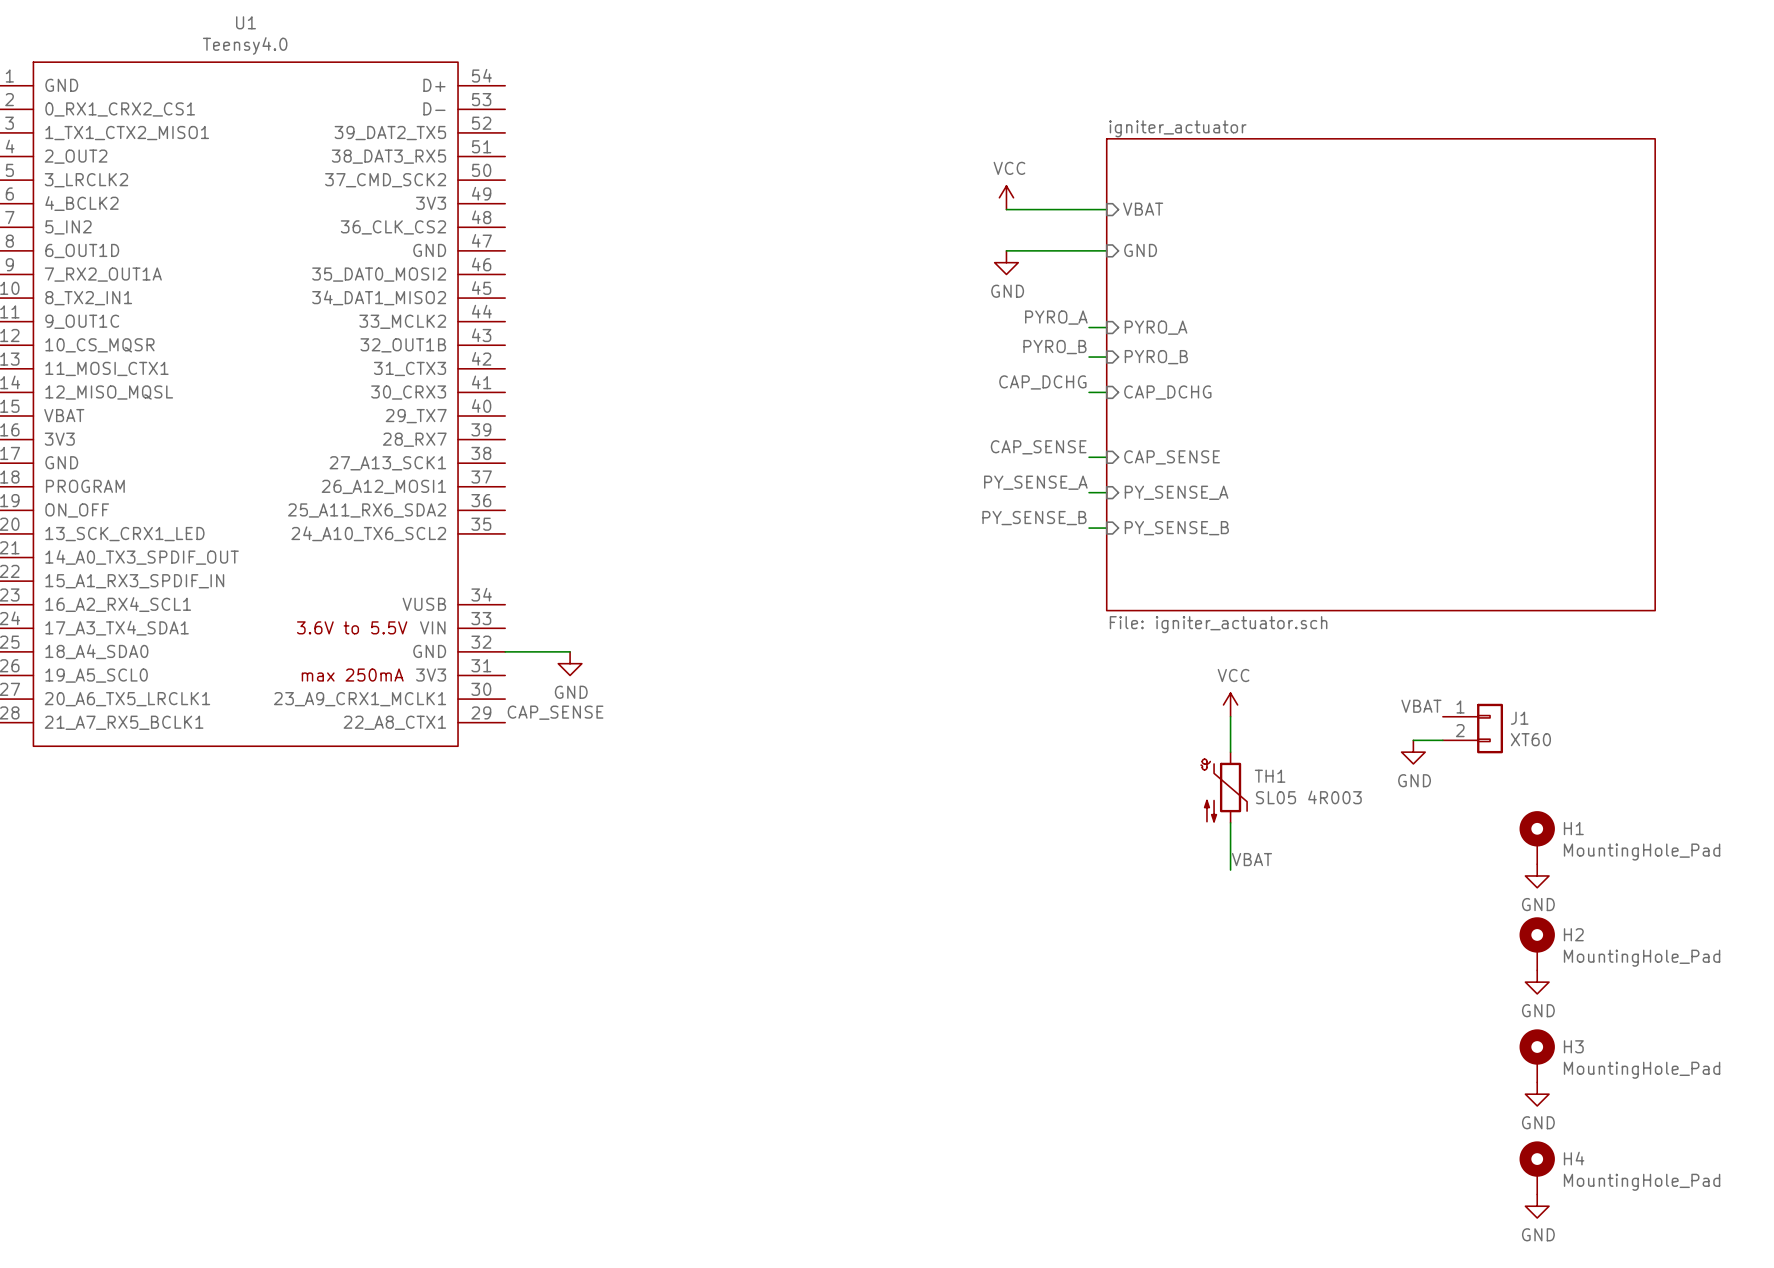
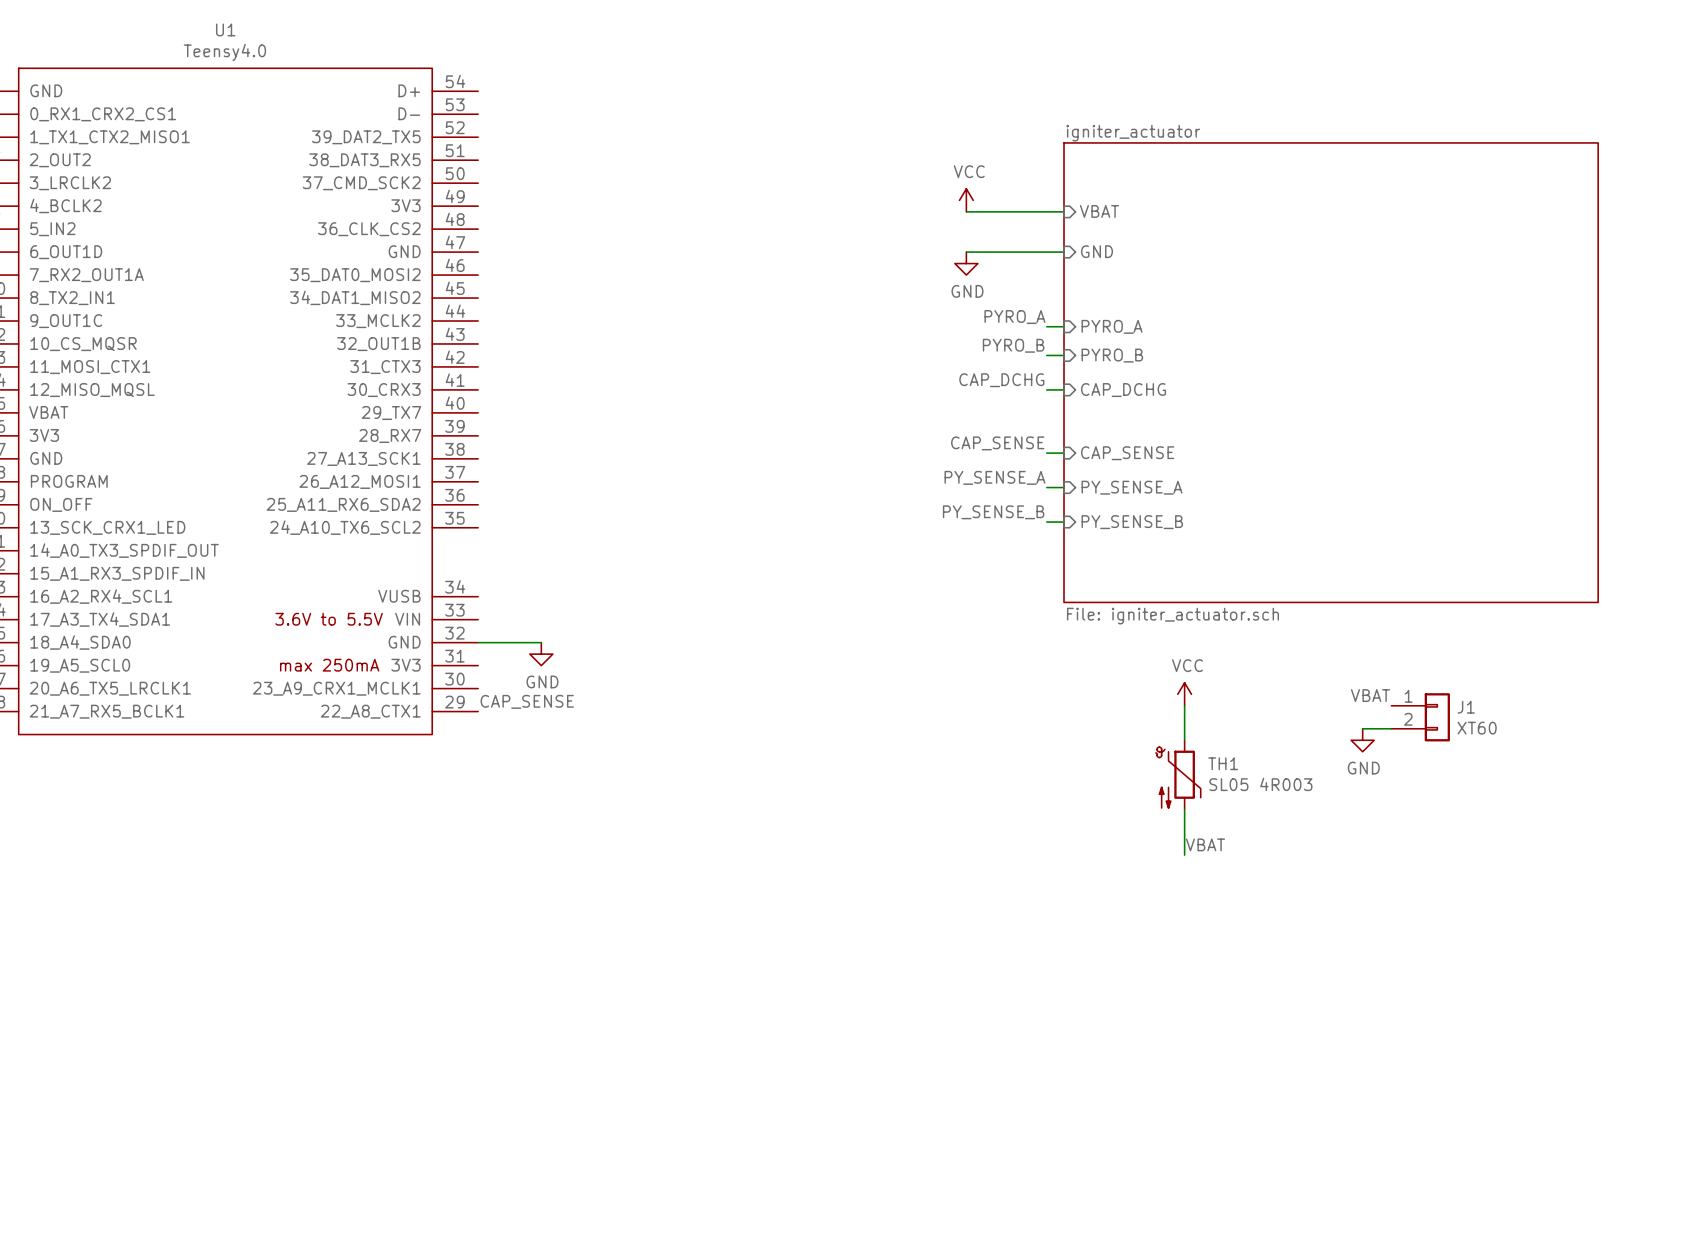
H1: MountingHole_Pad (1537, 837) -> none
power symbol: GND (1537, 875) -> none
H2: MountingHole_Pad (1537, 943) -> none
power symbol: GND (1537, 982) -> none
H3: MountingHole_Pad (1537, 1055) -> none
power symbol: GND (1537, 1094) -> none
H4: MountingHole_Pad (1537, 1167) -> none
power symbol: GND (1537, 1206) -> none

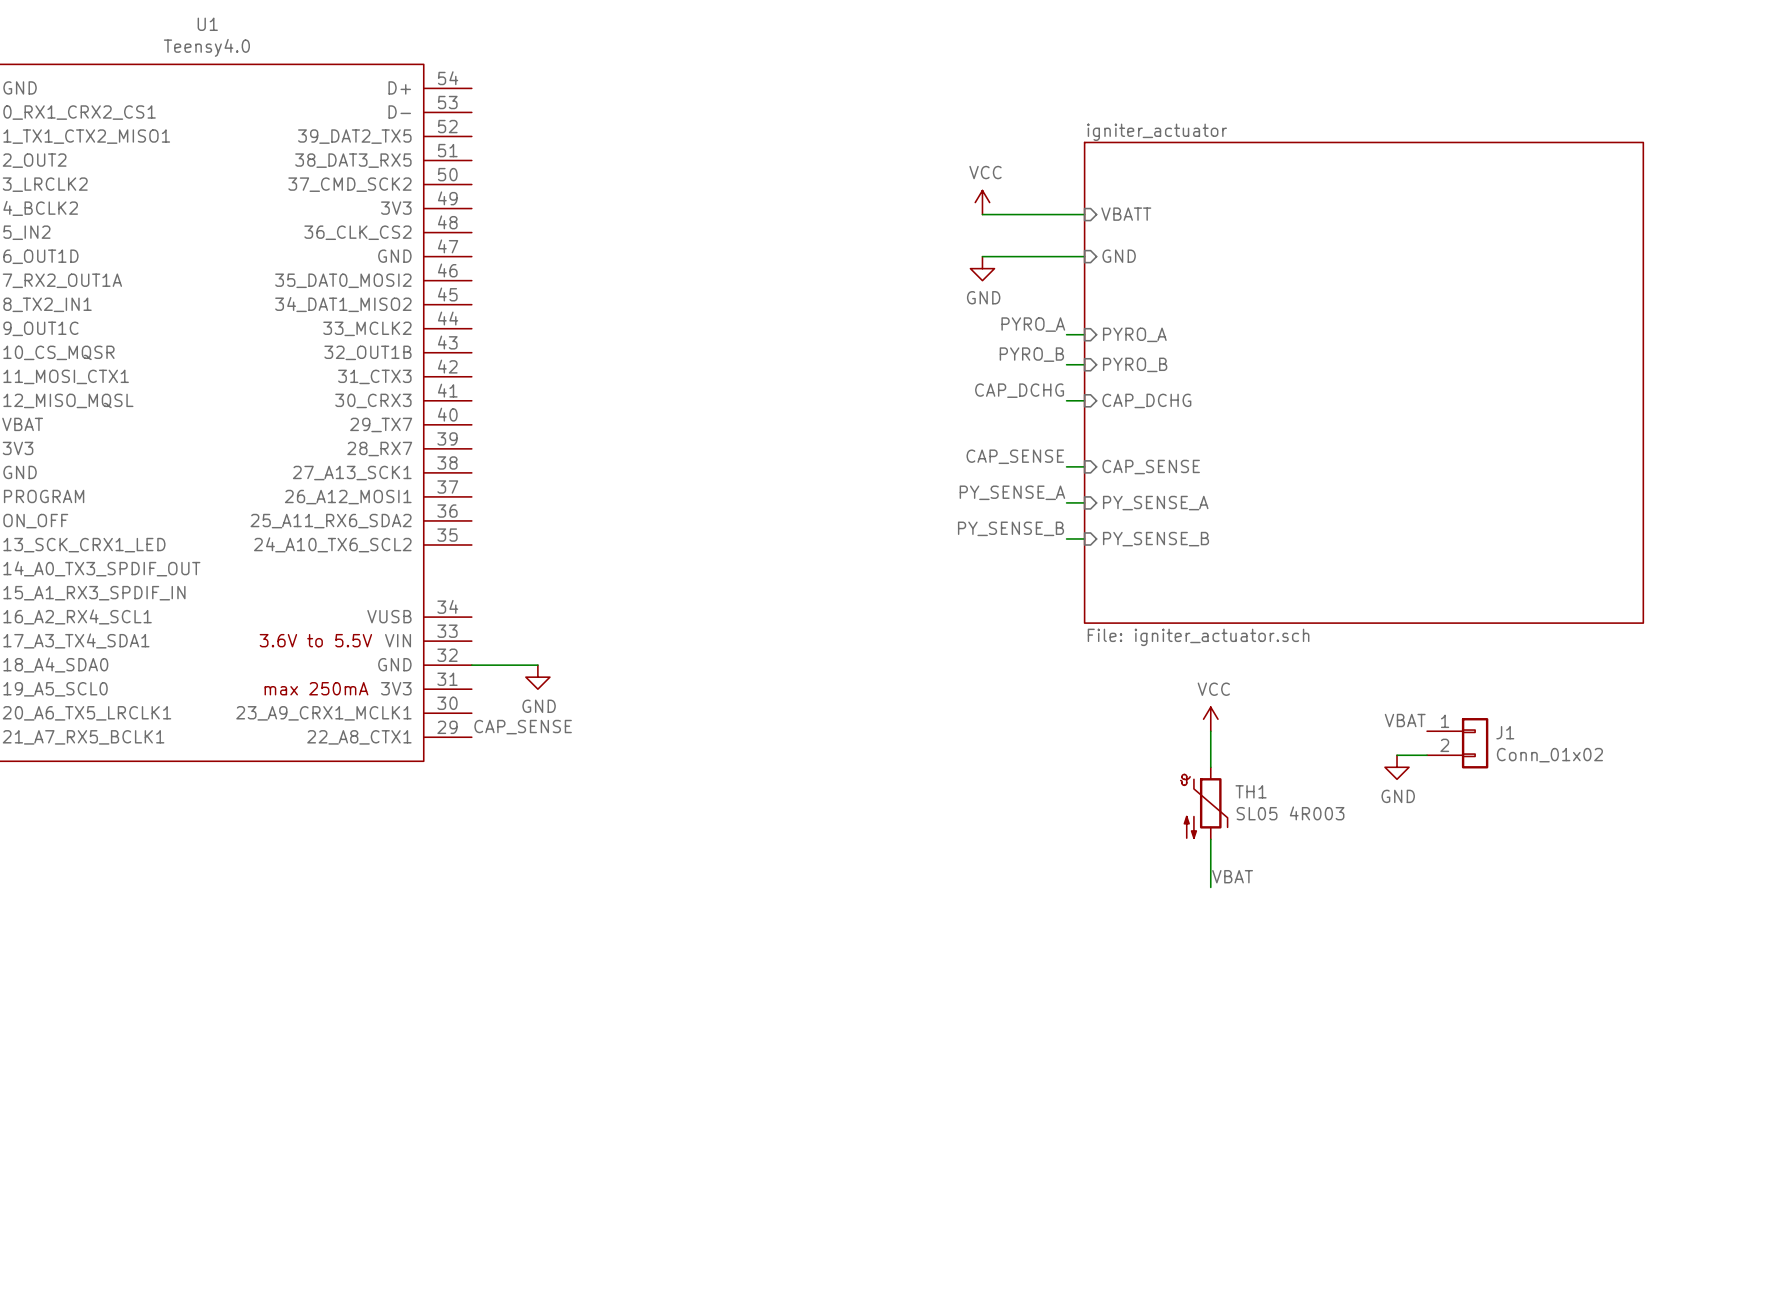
sheet pin: VBAT (1099, 211) -> VBATT (1126, 214)
J1 value: XT60 (1477, 728) -> Conn_01x02 (1549, 755)

